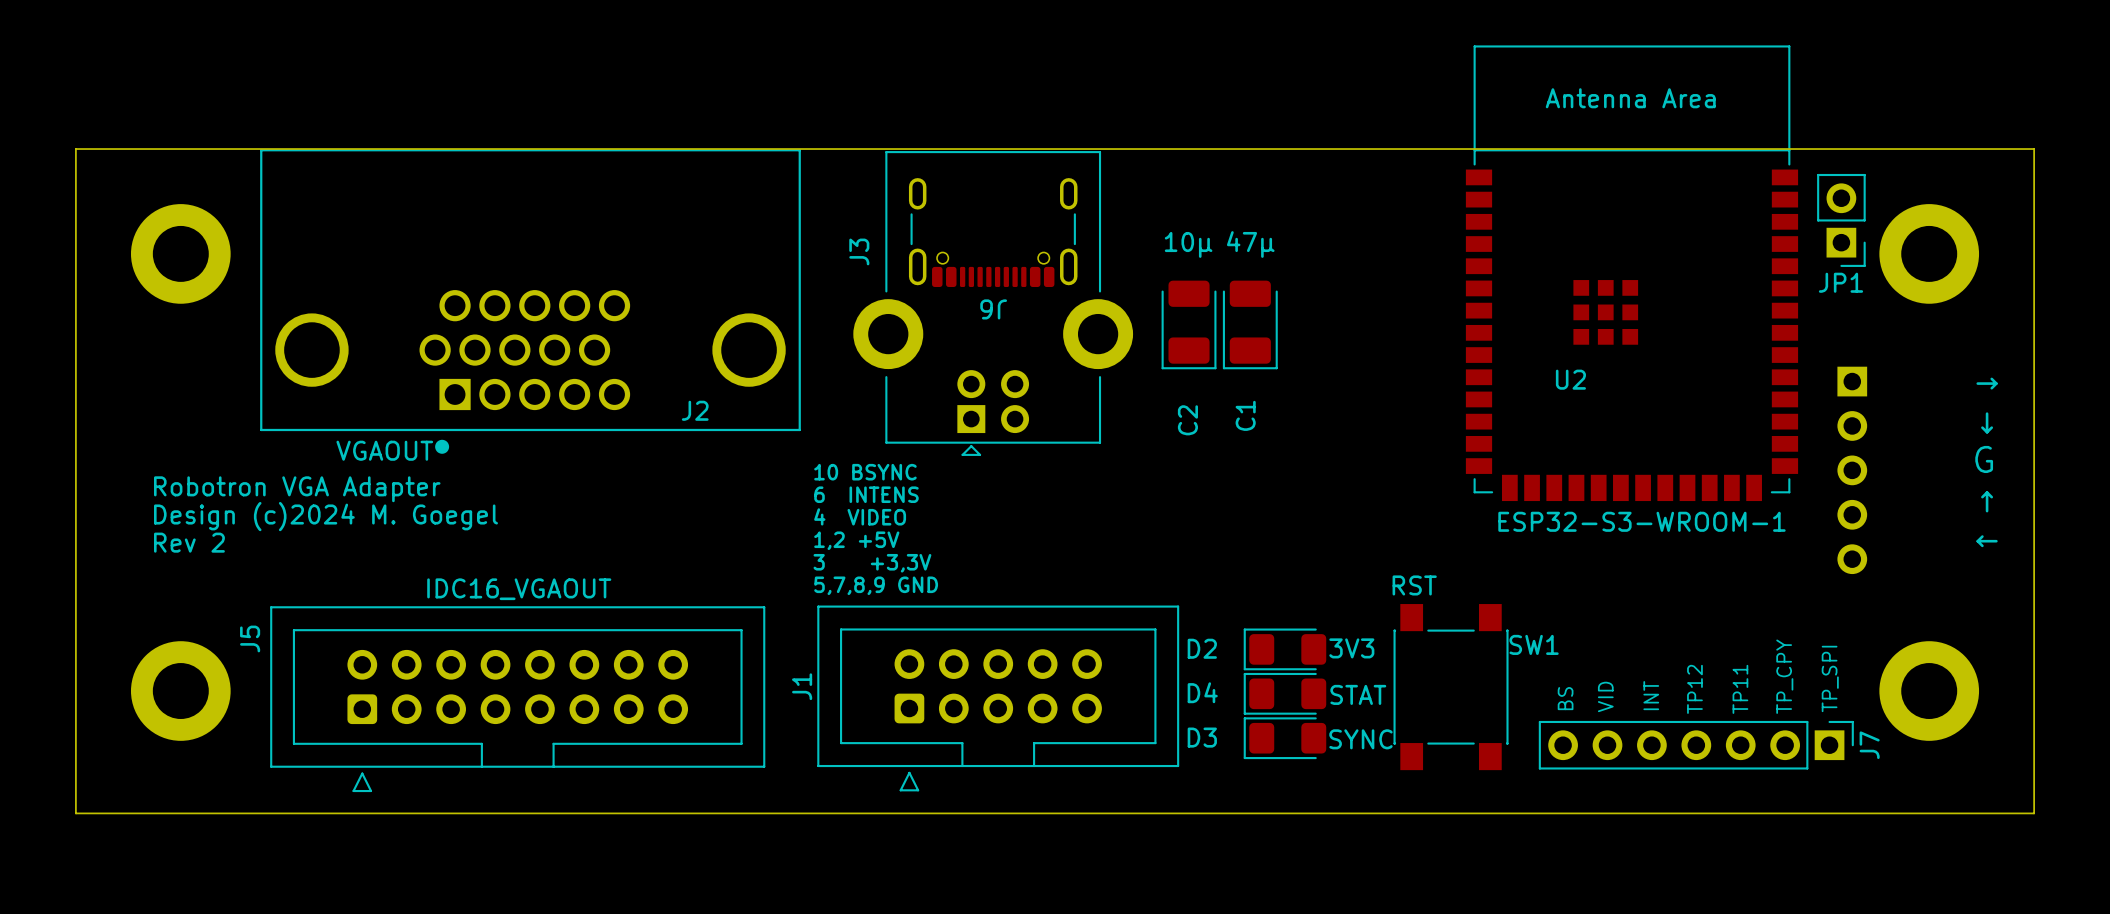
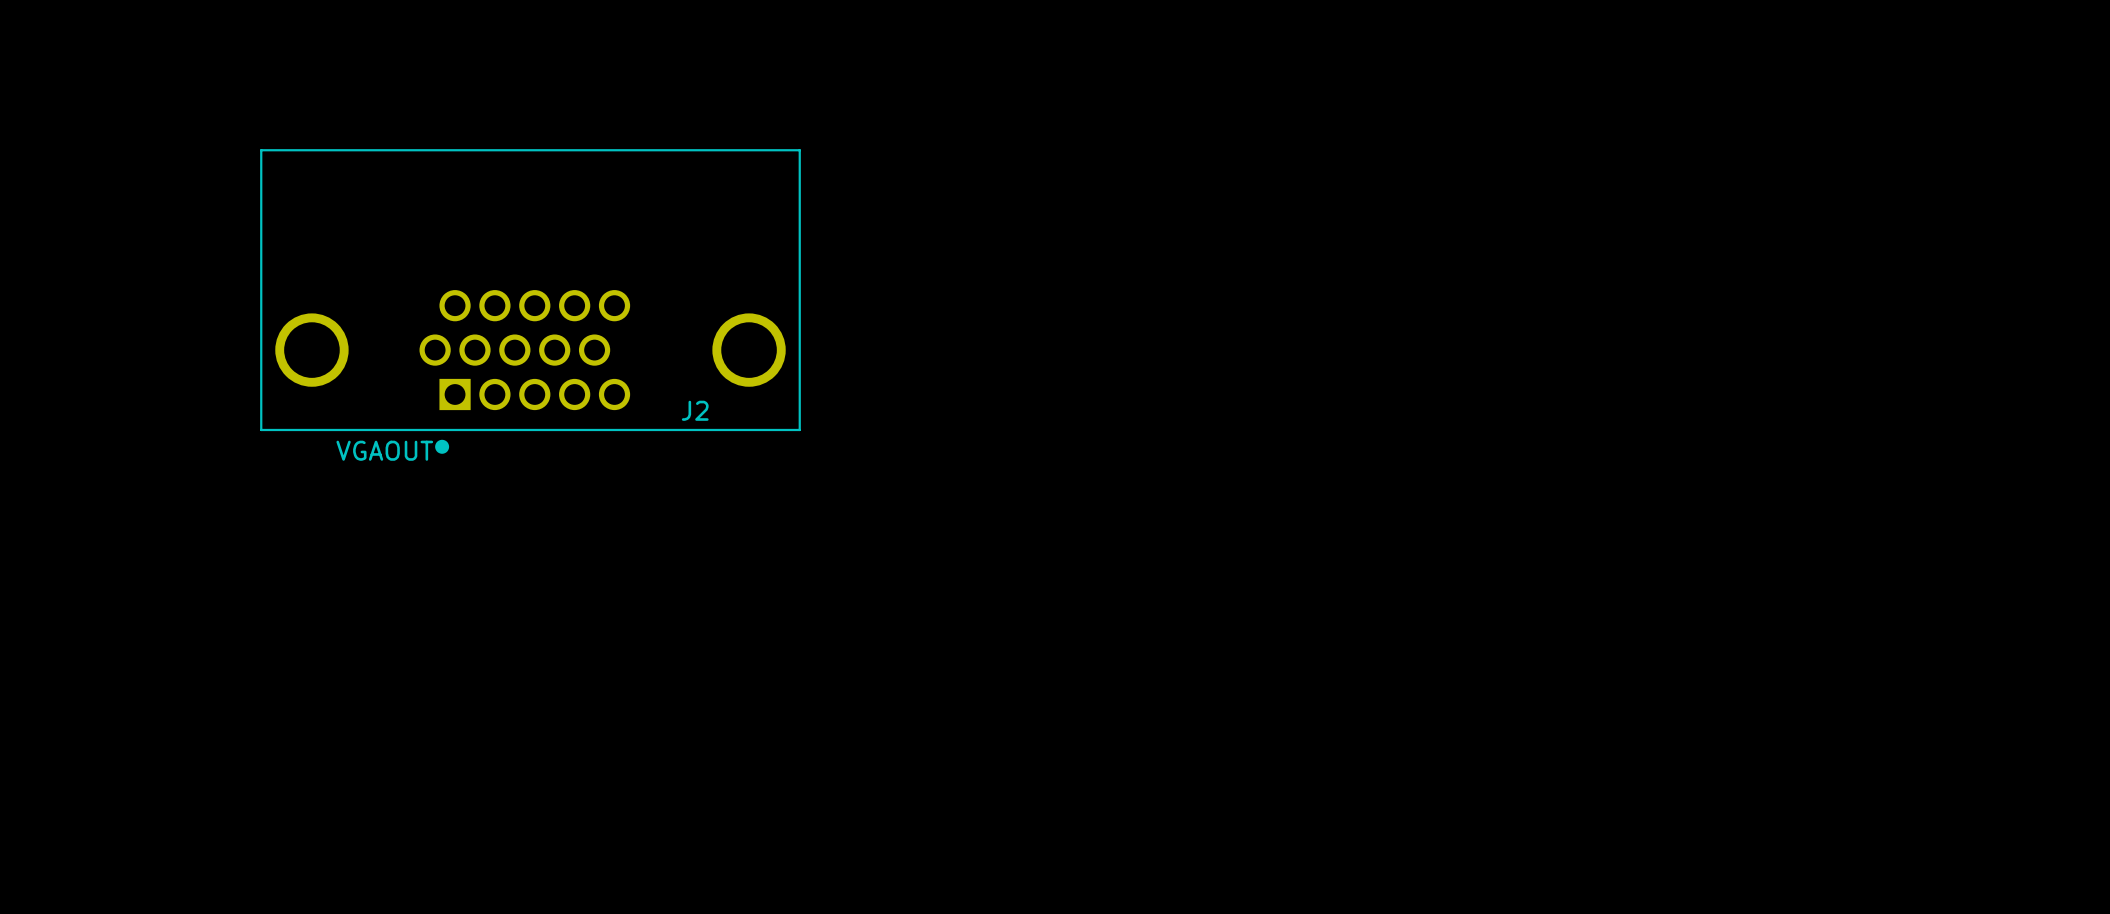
board edge: (75, 149) (2034, 149) (2034, 813) (75, 813) (75, 149) -> none
JP1: (1841, 220) -> none
J6: (993, 232) -> none
part: (180, 253) -> none
part: (1929, 253) -> none
U2: ESP32-S3-WROOM-1 (1631, 273) -> none
J3: (993, 303) -> none
C2: 10µ (1189, 324) -> none
C1: 47µ (1250, 324) -> none
text: → (1987, 383) -> none
text: ↓ (1987, 422) -> none
text: G (1984, 459) -> none
part: (1852, 470) -> none
text: 10 BSYNC (865, 472) -> none
text: Robotron VGA Adapter (297, 489) -> none
text: 6 INTENS (866, 494) -> none
text: ↑ (1987, 501) -> none
text: Design (c)2024 M. Goegel (325, 516) -> none
text: 4 VIDEO (860, 516) -> none
text: 1,2 +5V (856, 540) -> none
text: ← (1987, 541) -> none
text: Rev 2 (189, 542) -> none
text: 3 +3,3V (872, 563) -> none
text: 5,7,8,9 GND (876, 585) -> none
D2: 3V3 (1284, 649) -> none
text: TP_CPY (1784, 676) -> none
text: TP_SPI (1830, 678) -> none
SW1: RST (1451, 687) -> none
text: TP12 (1694, 689) -> none
text: TP11 (1740, 689) -> none
part: (180, 691) -> none
part: (1929, 691) -> none
D4: STAT (1284, 693) -> none
text: INT (1651, 695) -> none
text: VID (1605, 696) -> none
J1: (998, 698) -> none
text: BS (1565, 698) -> none
J5: IDC16_VGAOUT (517, 699) -> none
D3: SYNC (1284, 738) -> none
J7: (1696, 745) -> none

